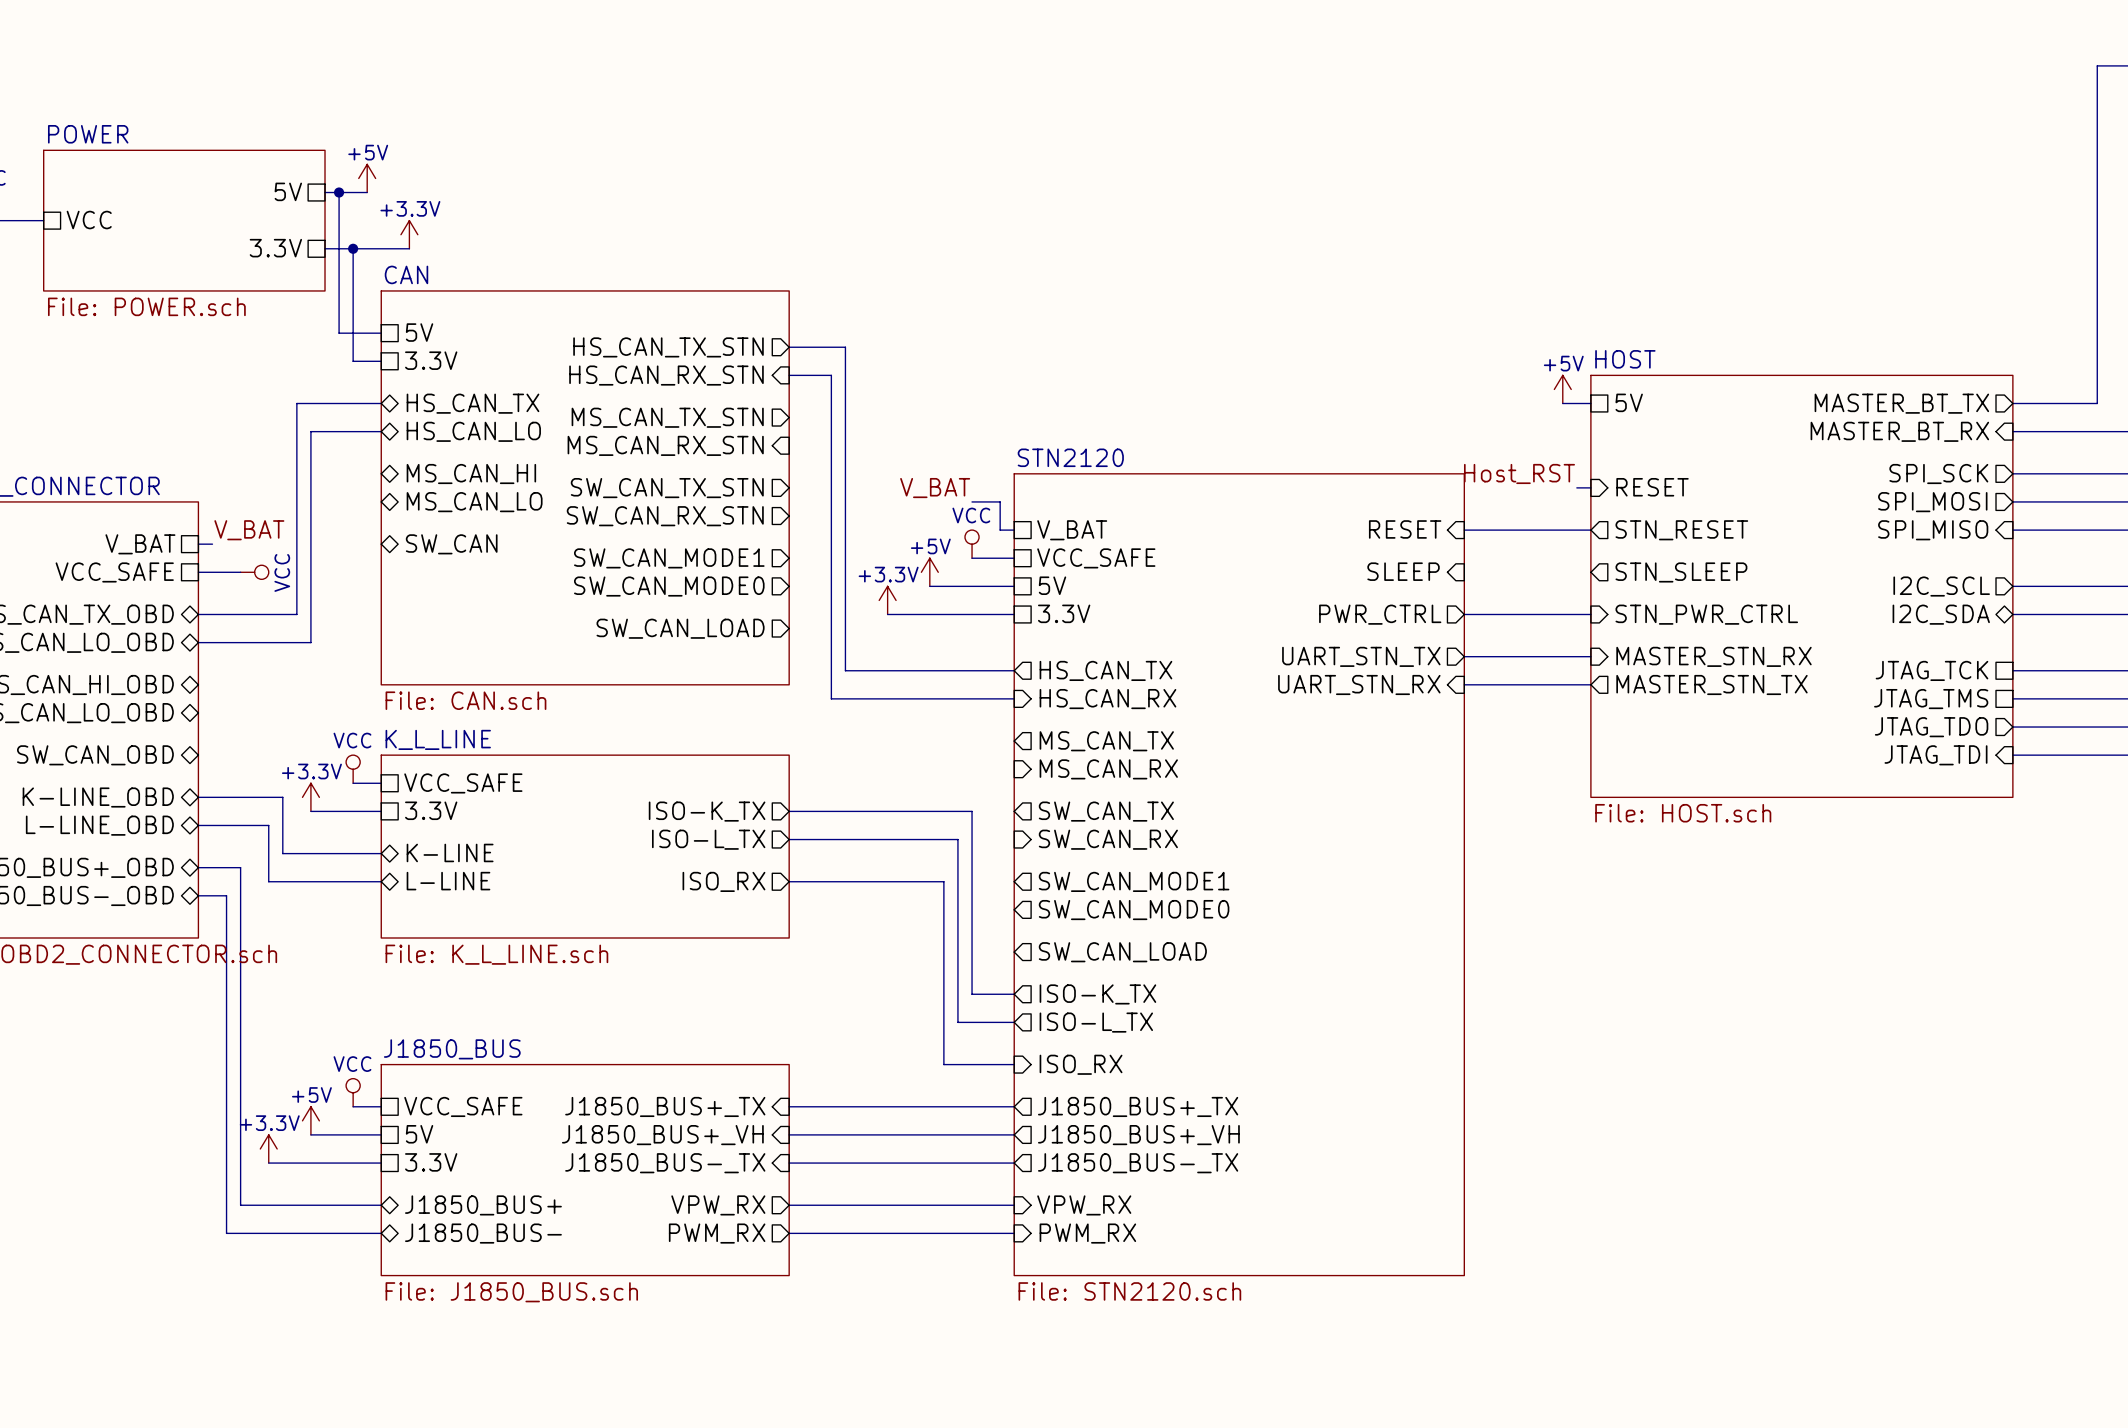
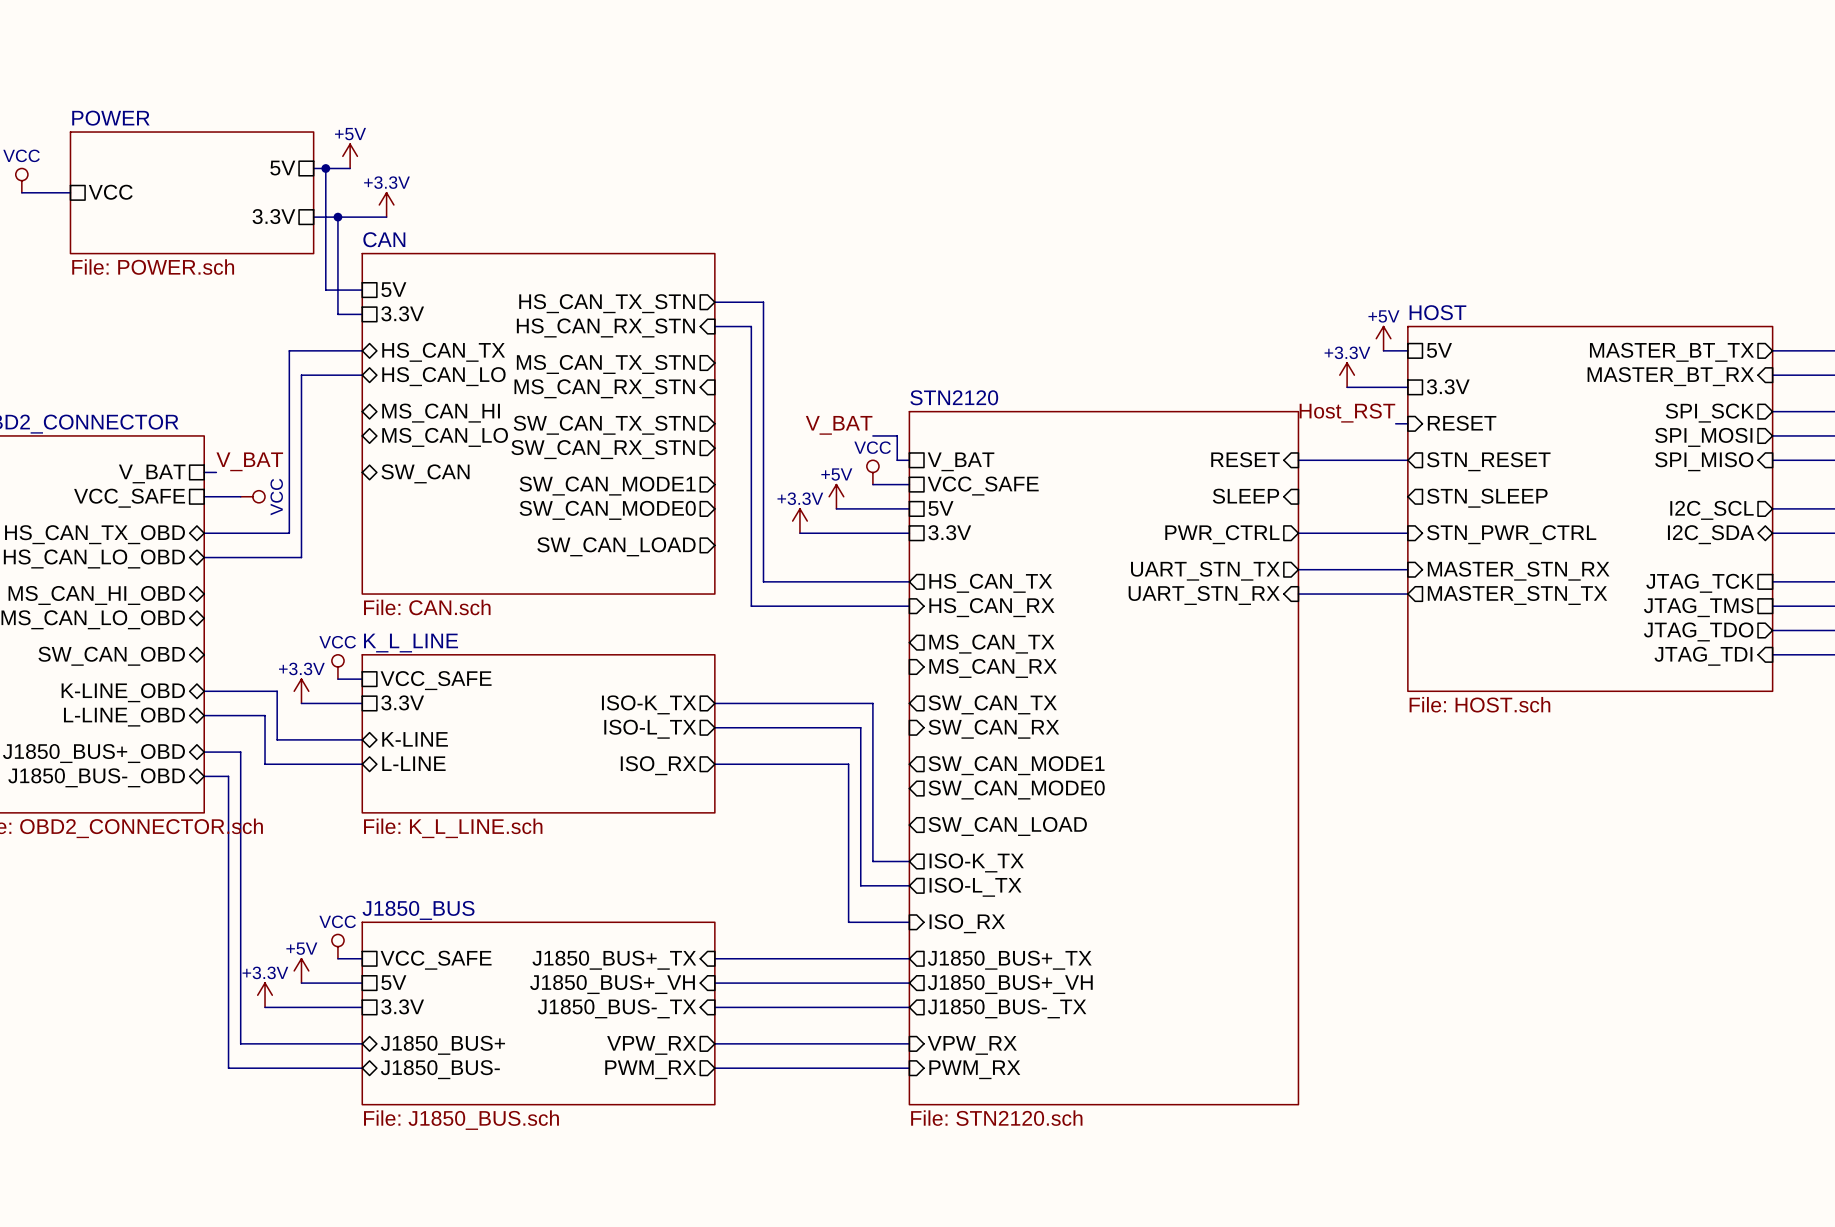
power symbol: none -> +3.3V (1347, 375)
wire: none -> (1347, 387) (1407, 387)
sheet pin: none -> 3.3V (1448, 386)

